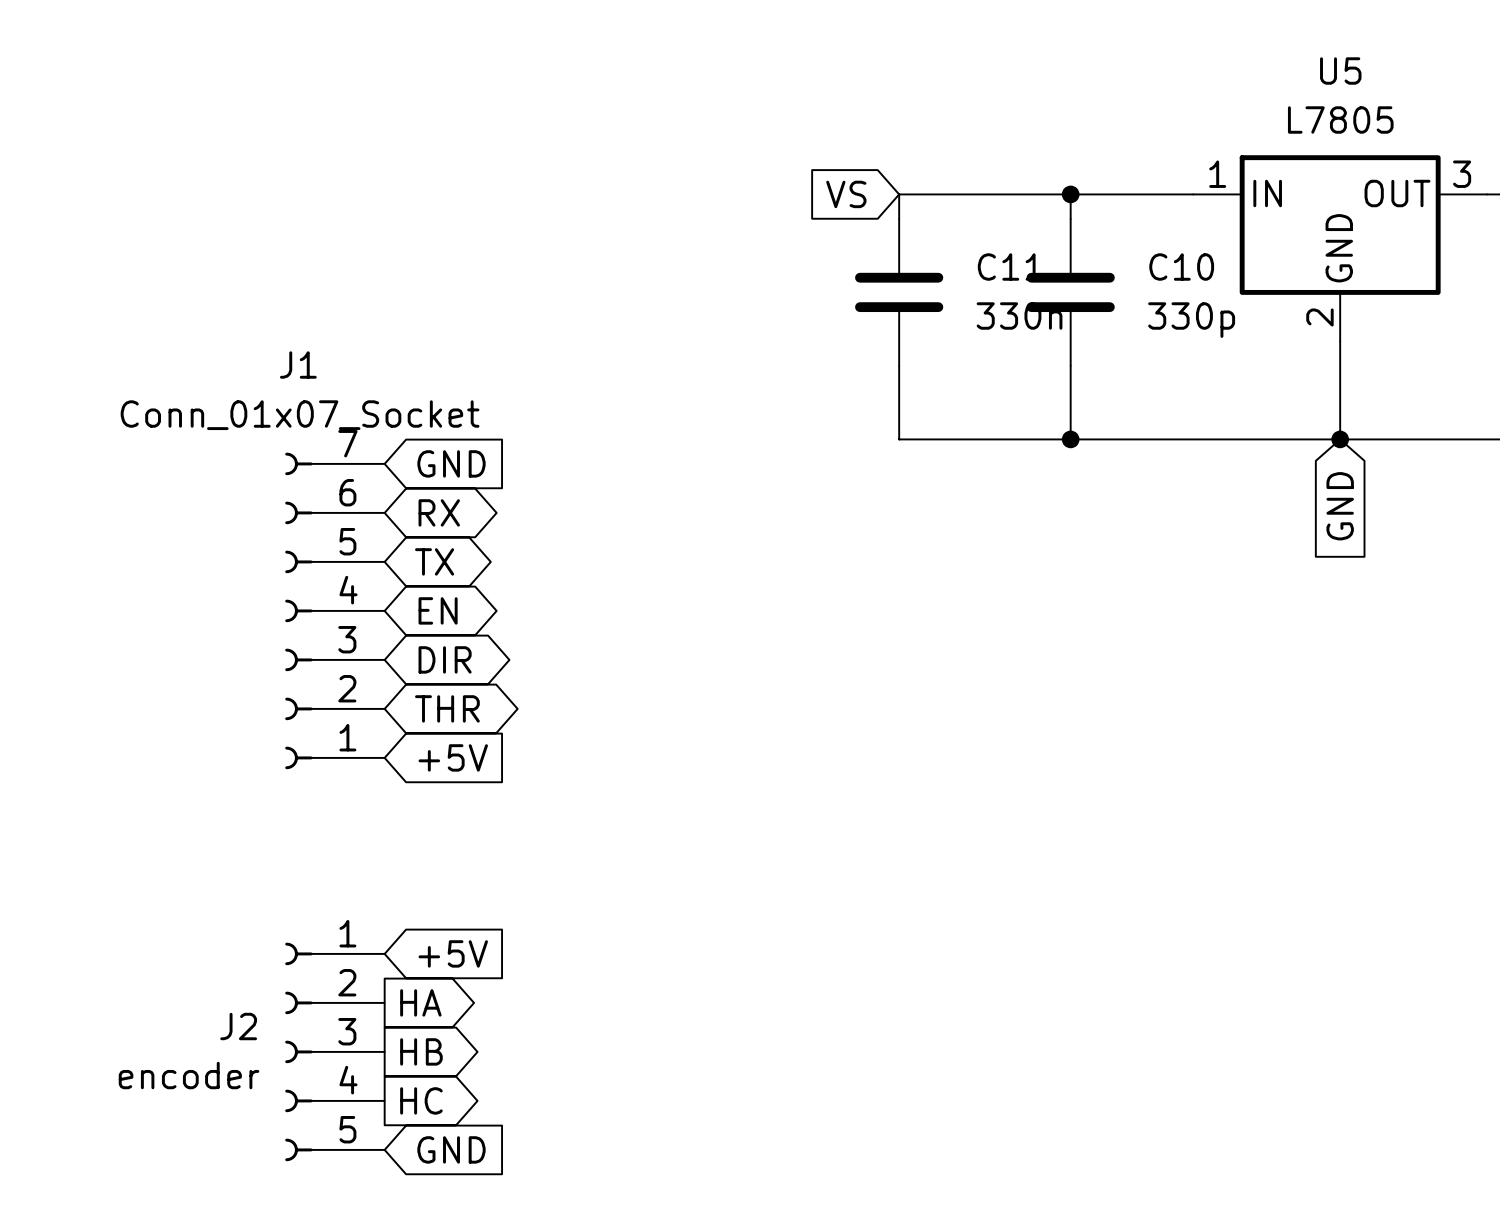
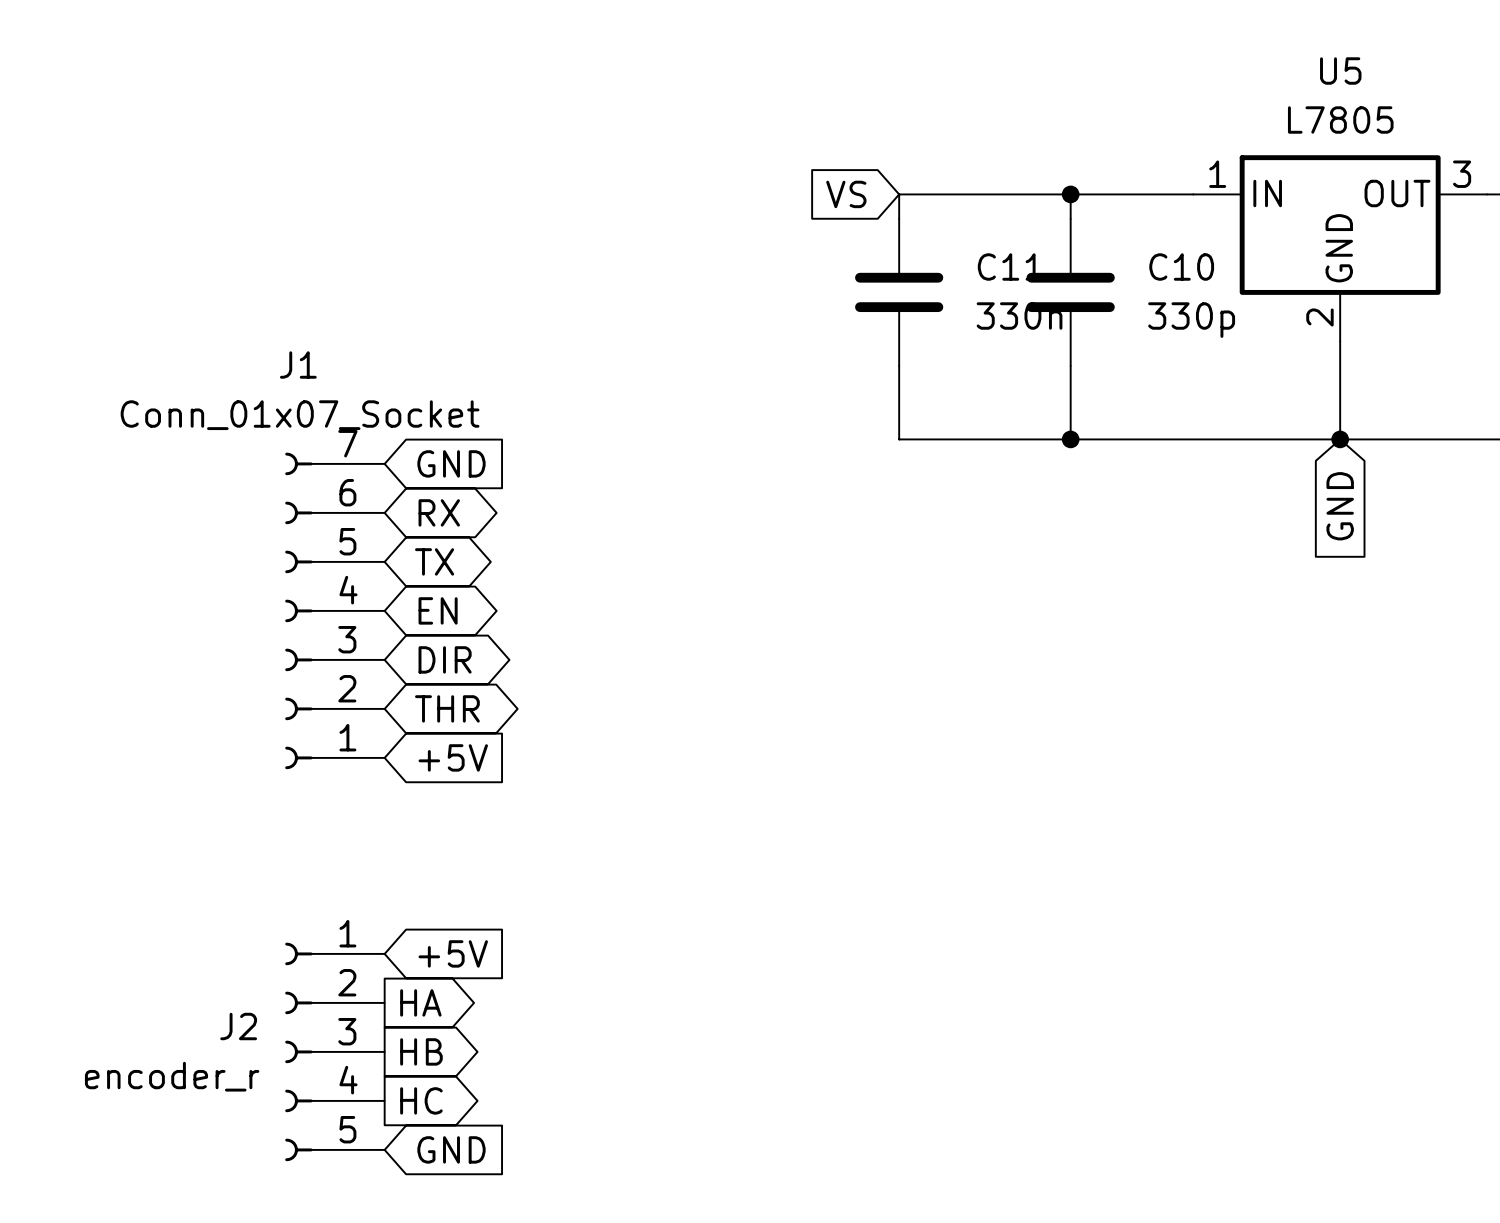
J2 value: encoder (189, 1075) -> encoder_r (172, 1076)

